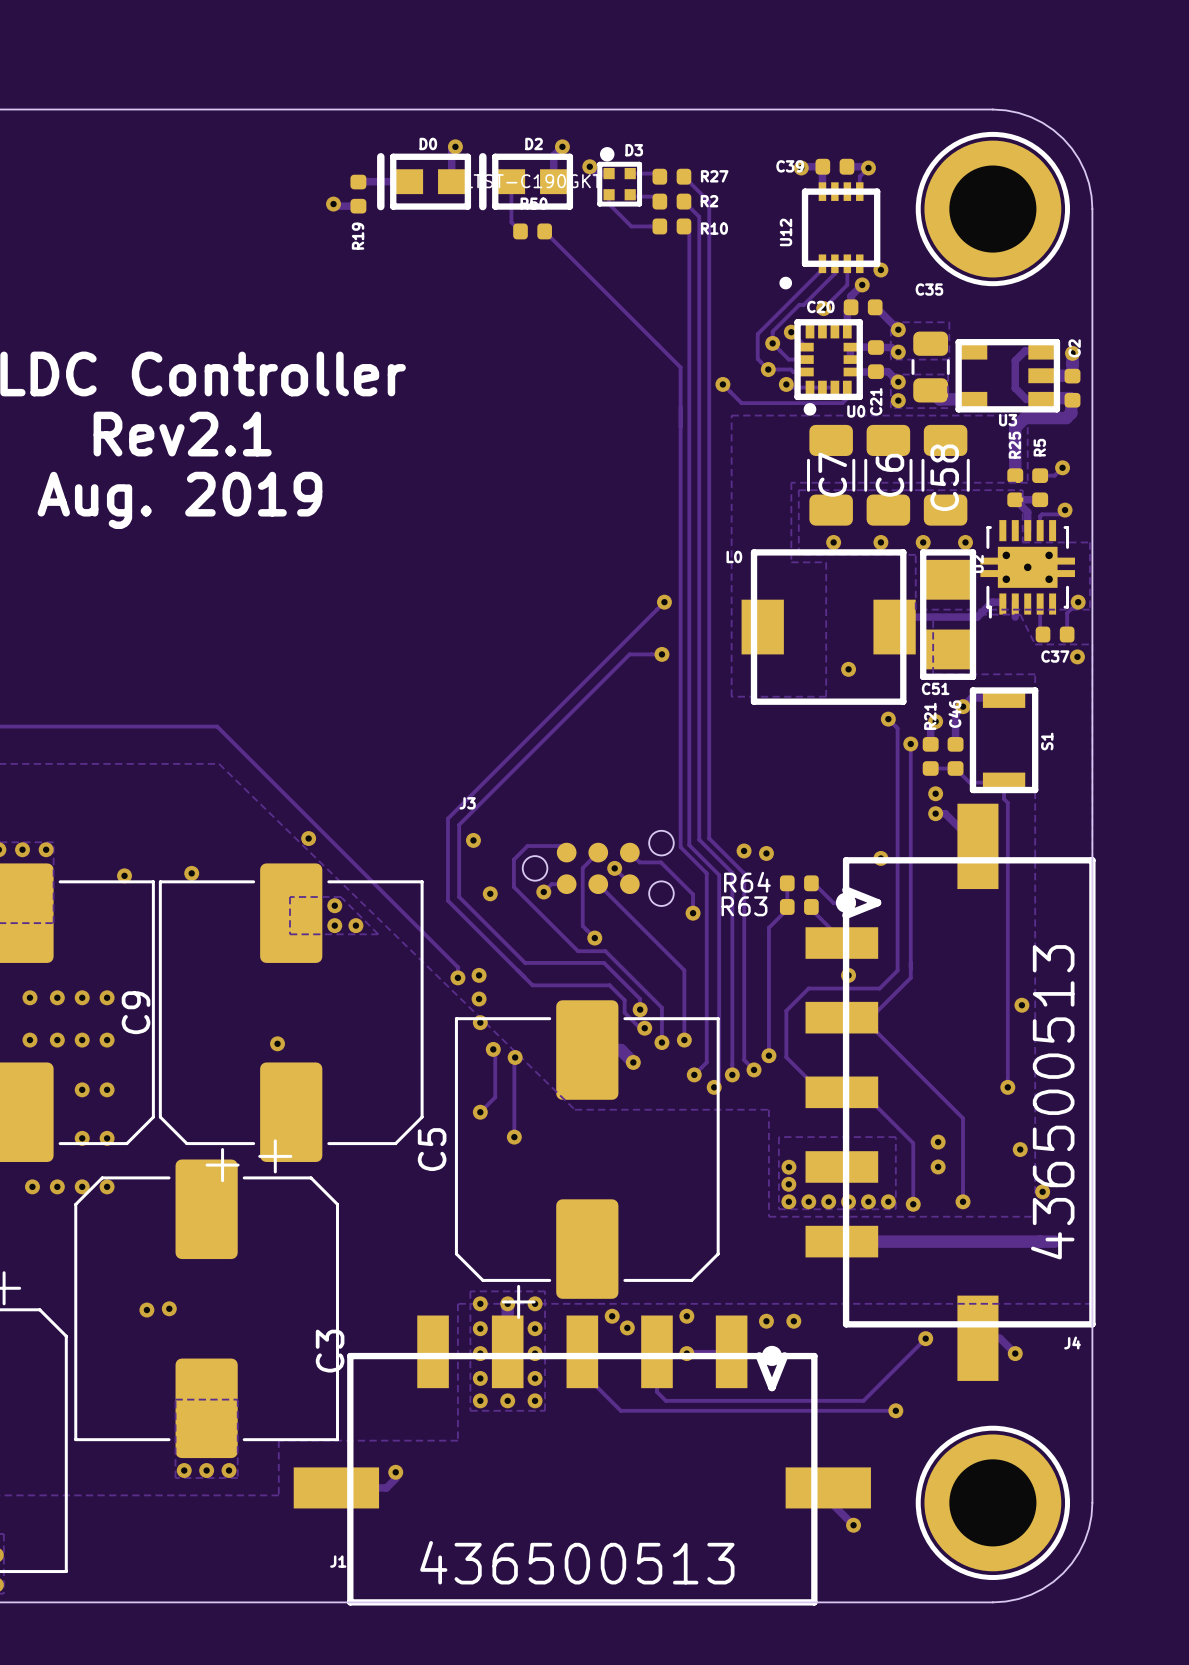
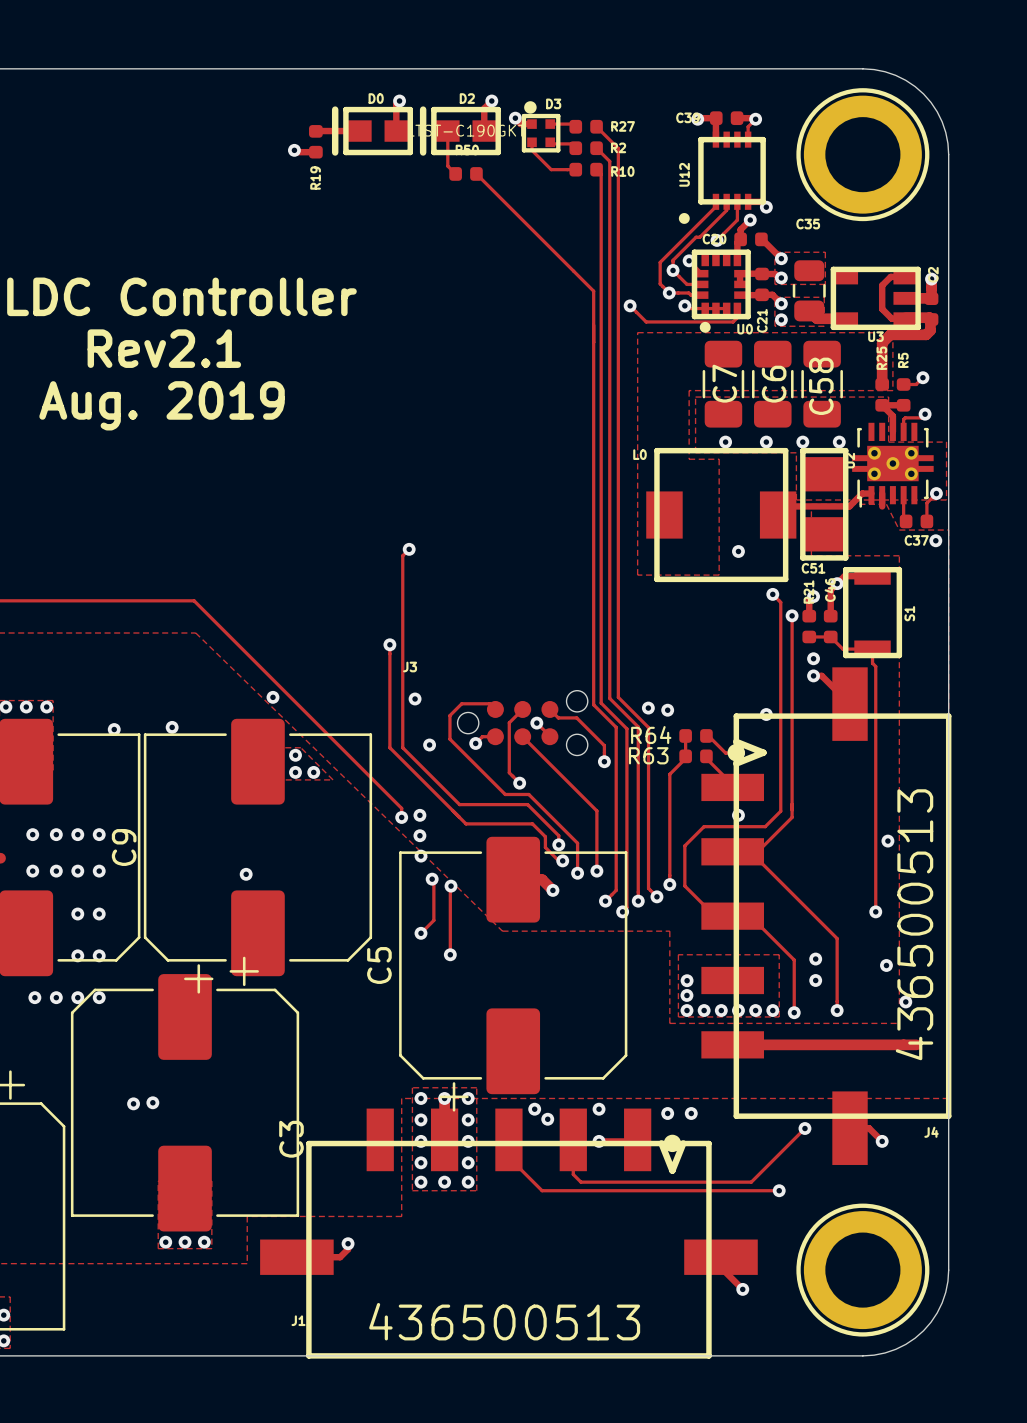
track: (664, 602) (447, 818) (447, 900) -> (389, 644) (389, 747) (393, 750)
via: (664, 602) -> none
track: (661, 654) (629, 654) (459, 824) -> (409, 549) (402, 555) (402, 685)
via: (661, 654) -> none
via: none -> (409, 549)
via: none -> (389, 644)

